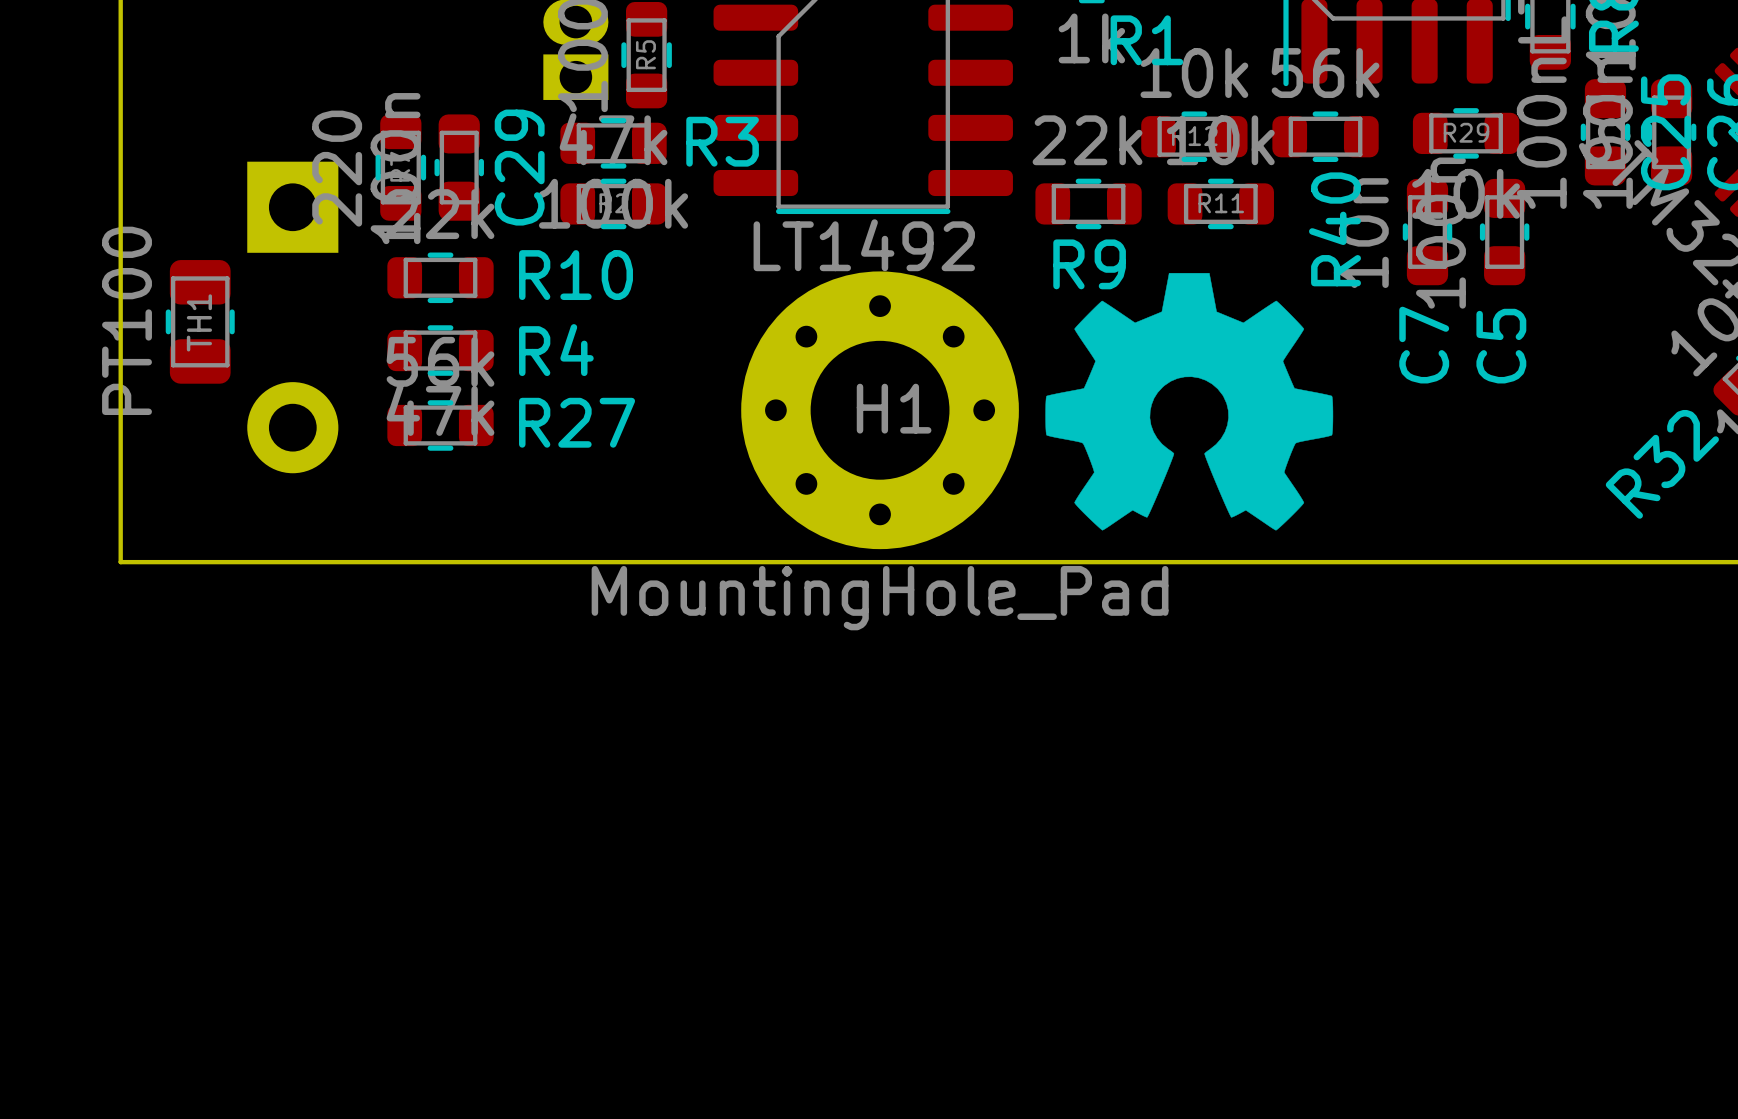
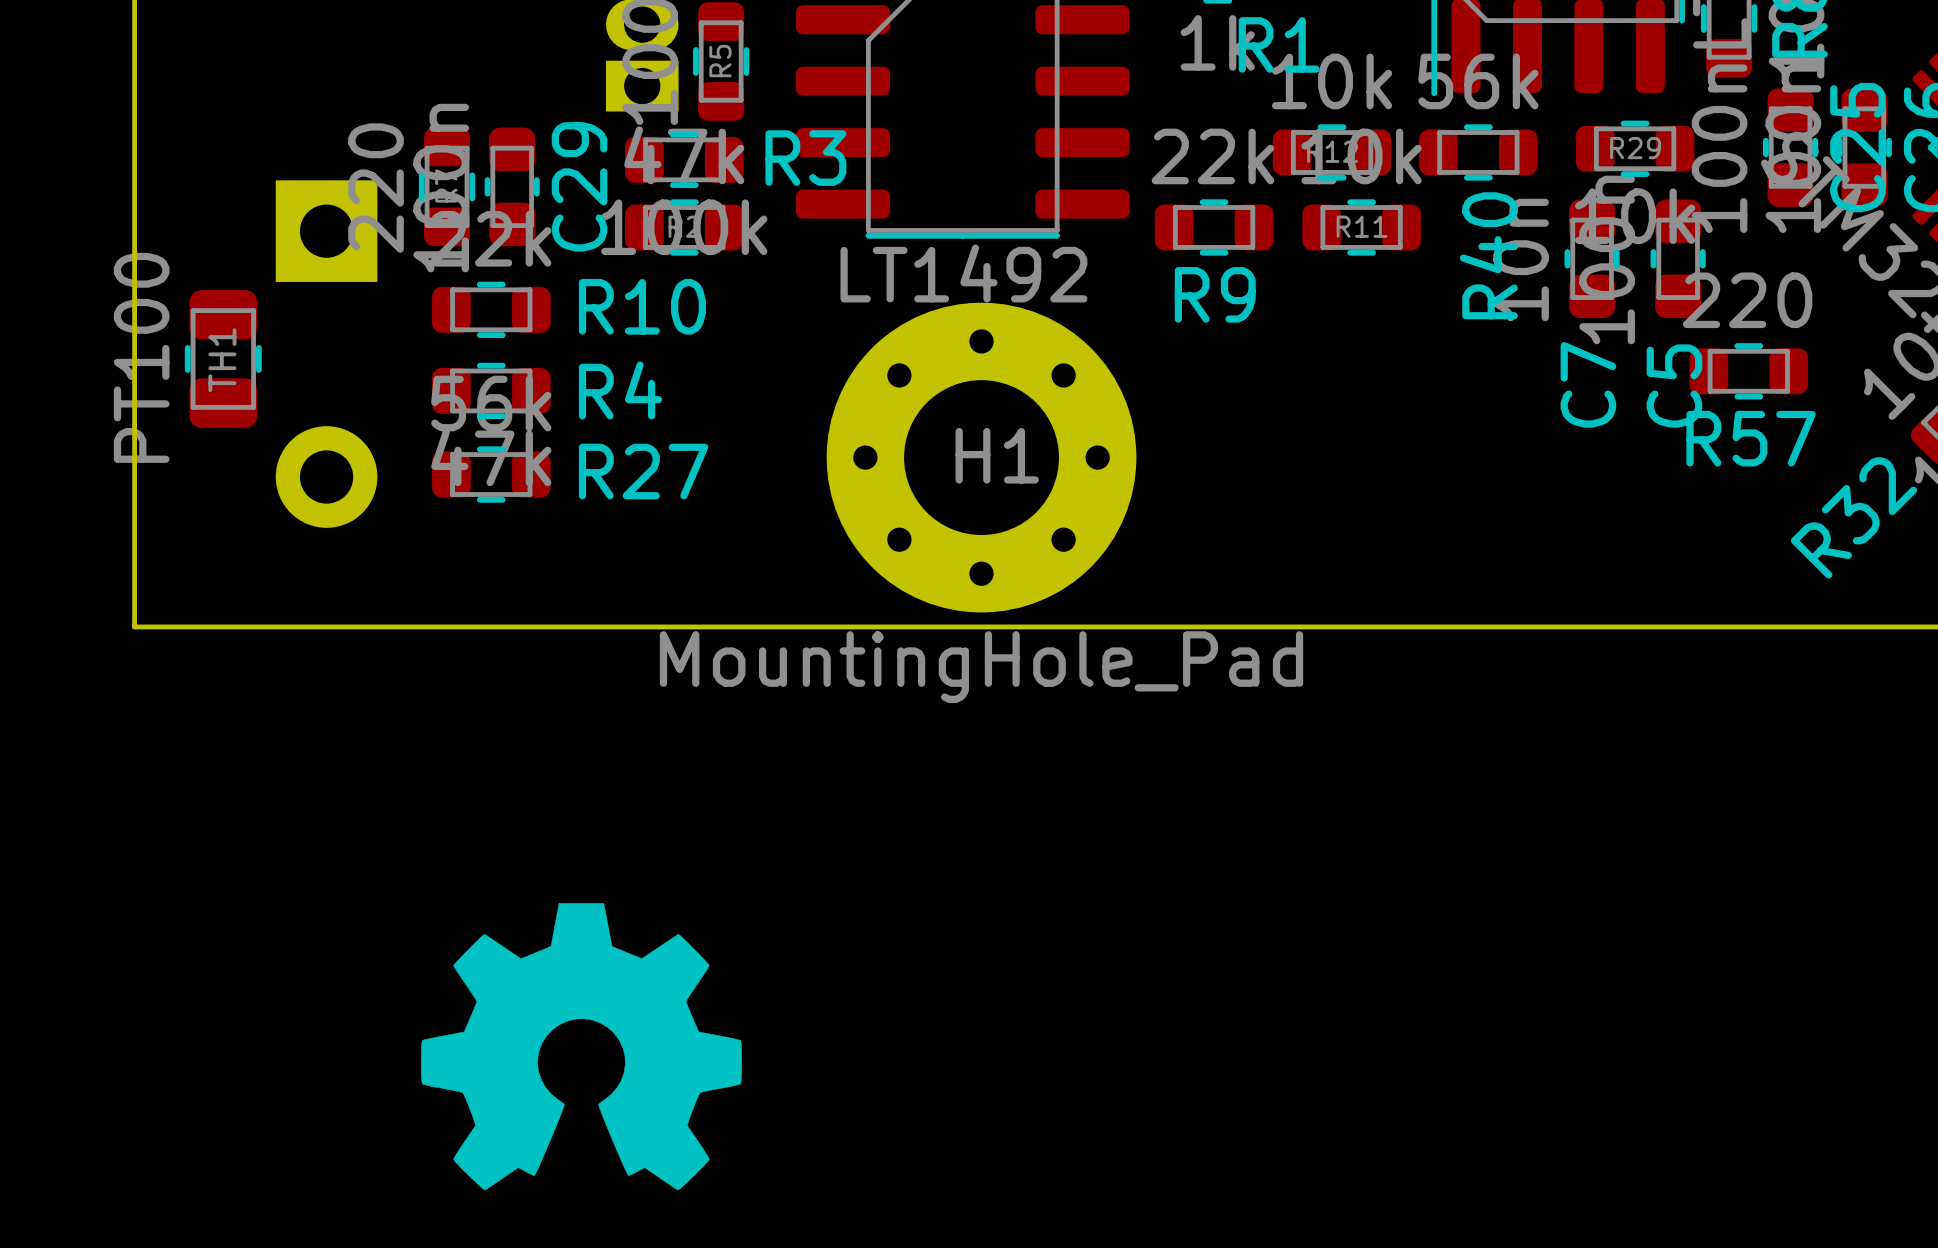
R57: none -> 220 (1748, 371)
drawing position: (1189, 401) -> (581, 1046)

